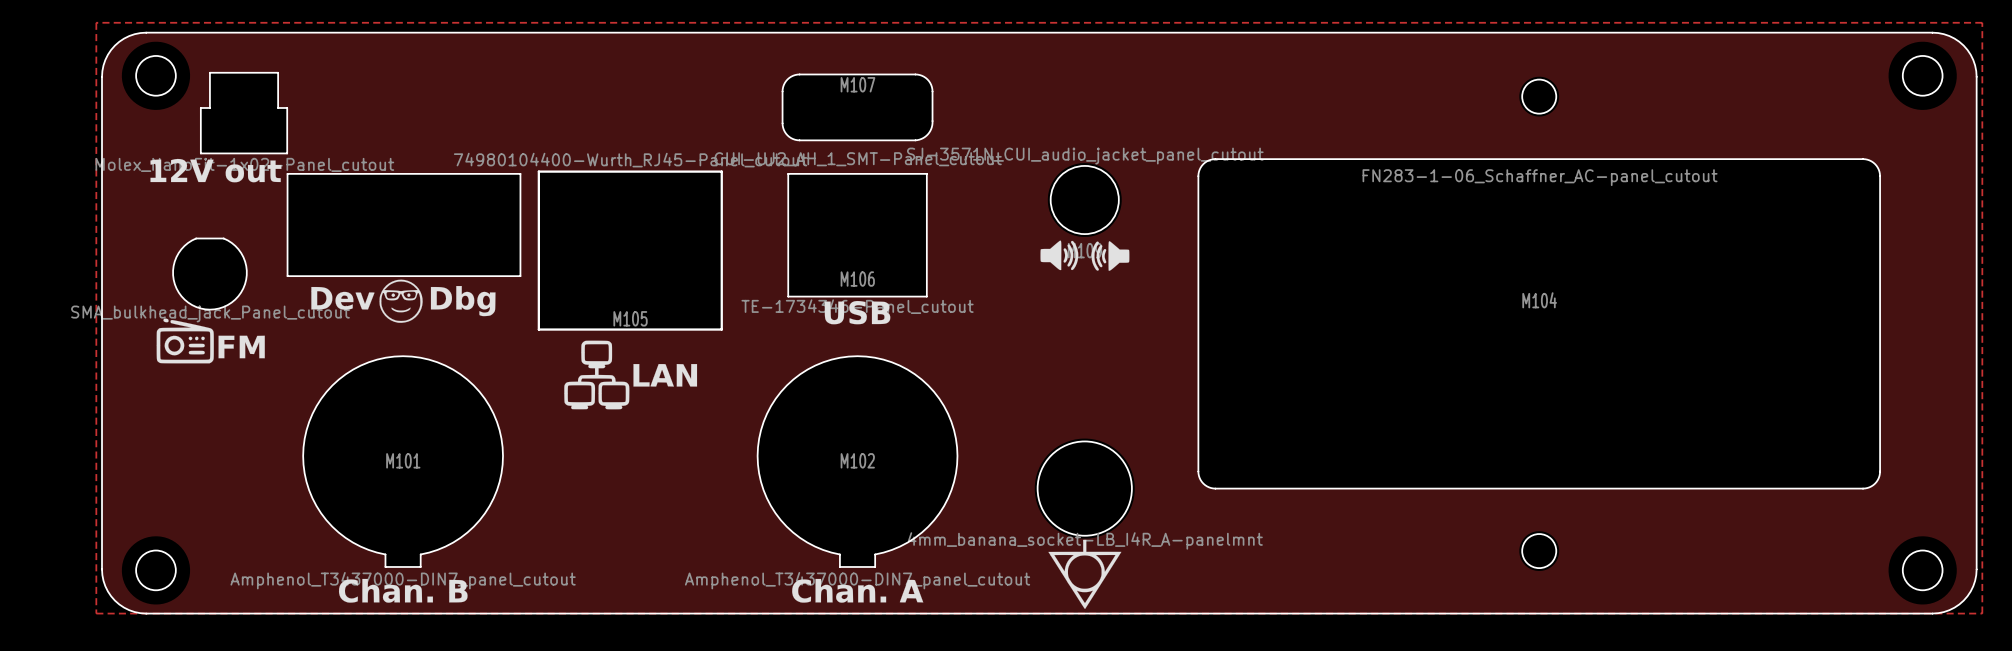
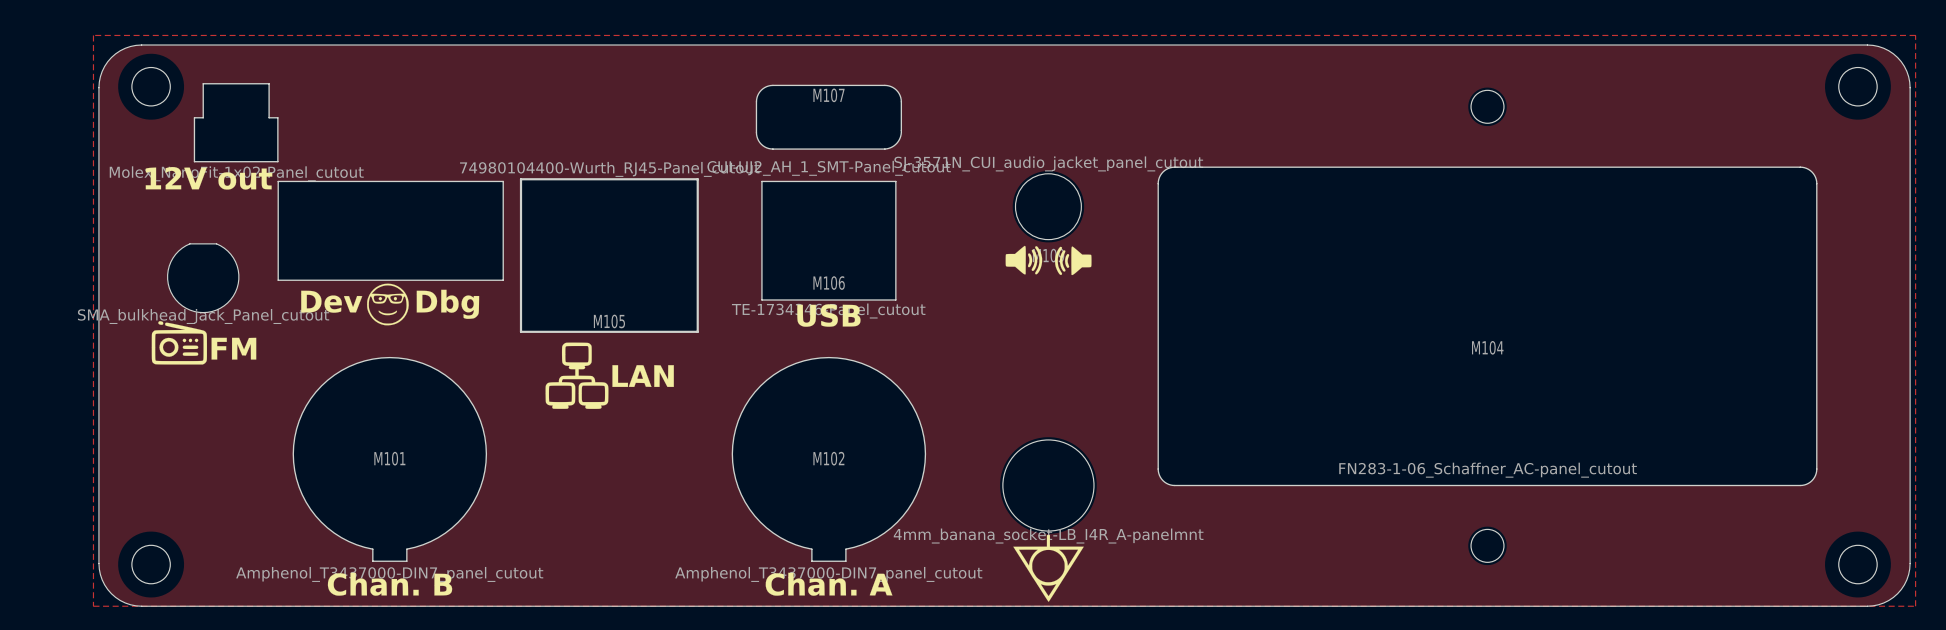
M104 value position: FN283-1-06_Schaffner_AC-panel_cutout (1540, 177) -> FN283-1-06_Schaffner_AC-panel_cutout (1488, 470)
M104 name position: M104 (1539, 300) -> M104 (1487, 347)

